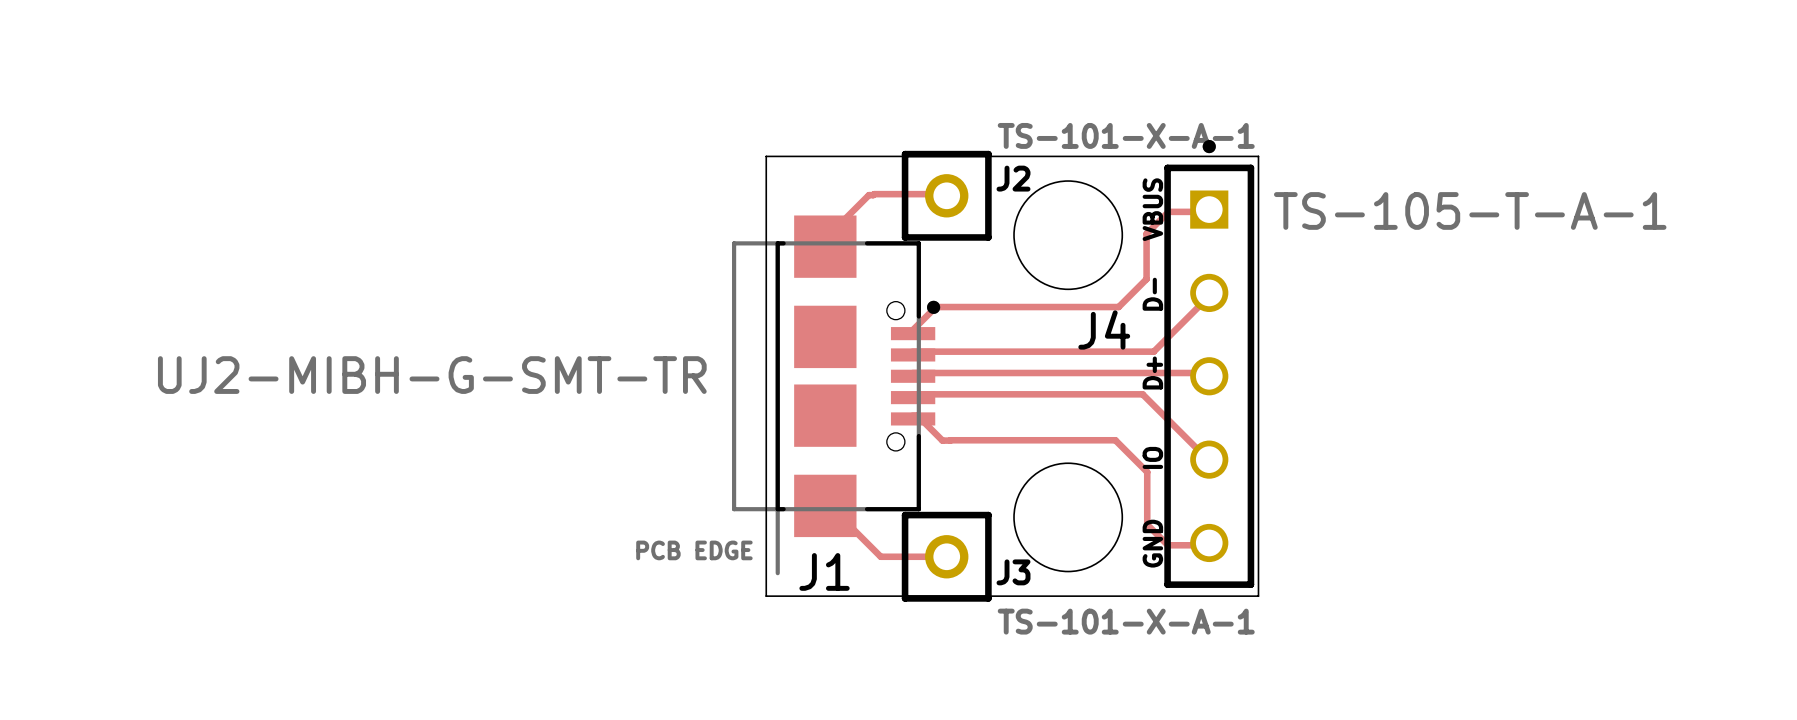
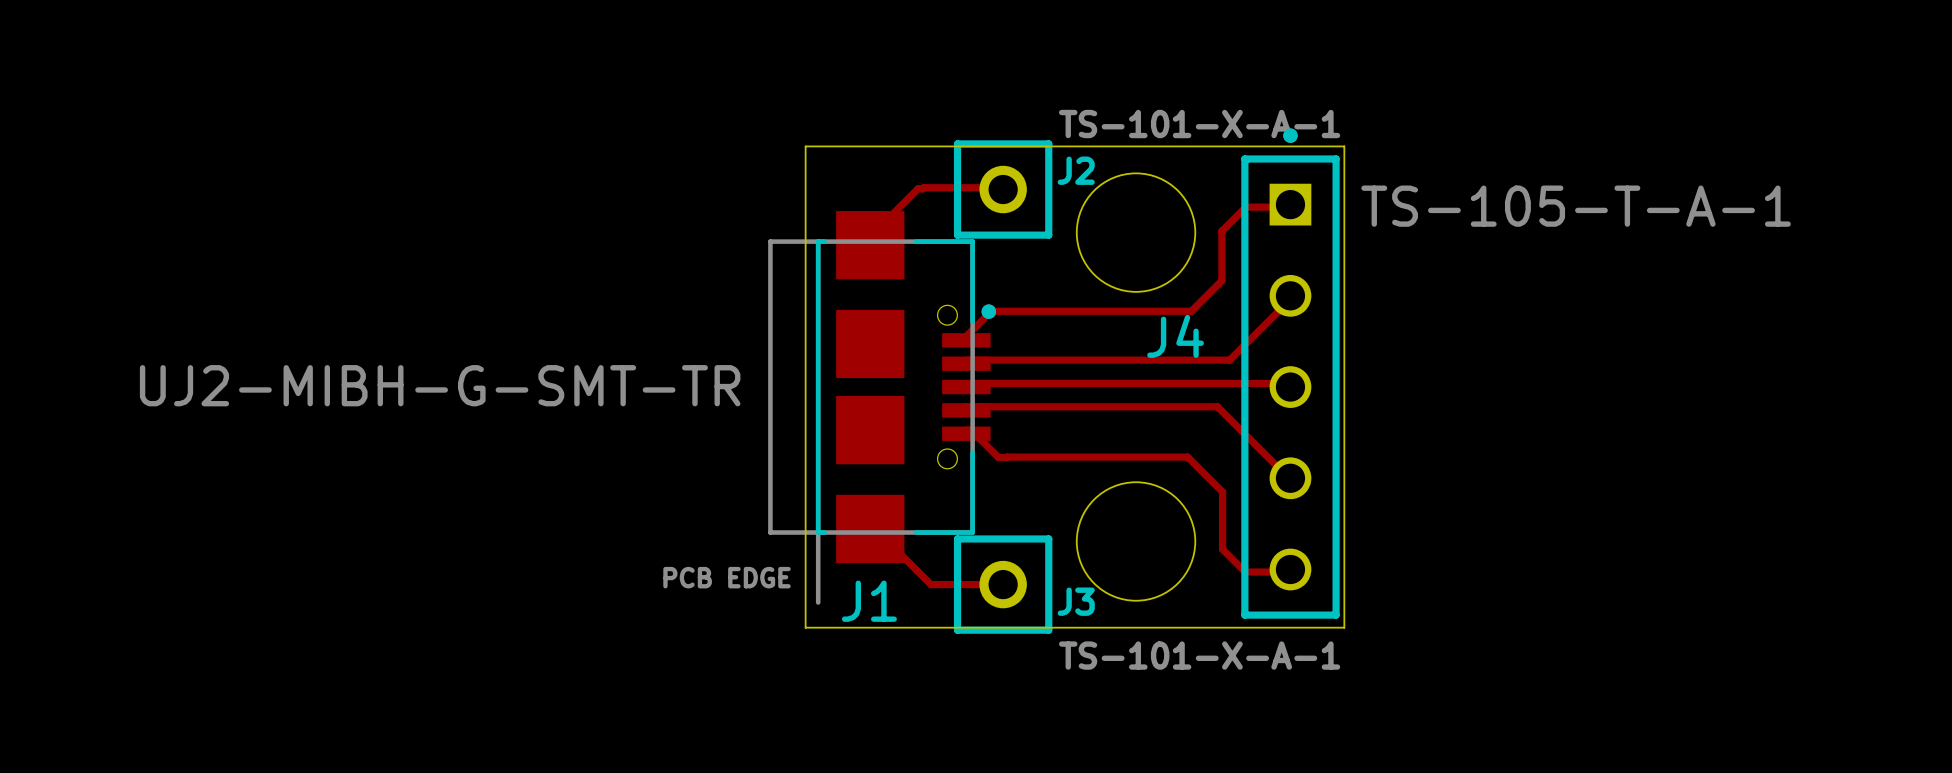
text: VBUS (1152, 209) -> none
text: D- (1152, 294) -> none
text: D+ (1152, 372) -> none
text: IO (1152, 457) -> none
text: GND (1152, 543) -> none

